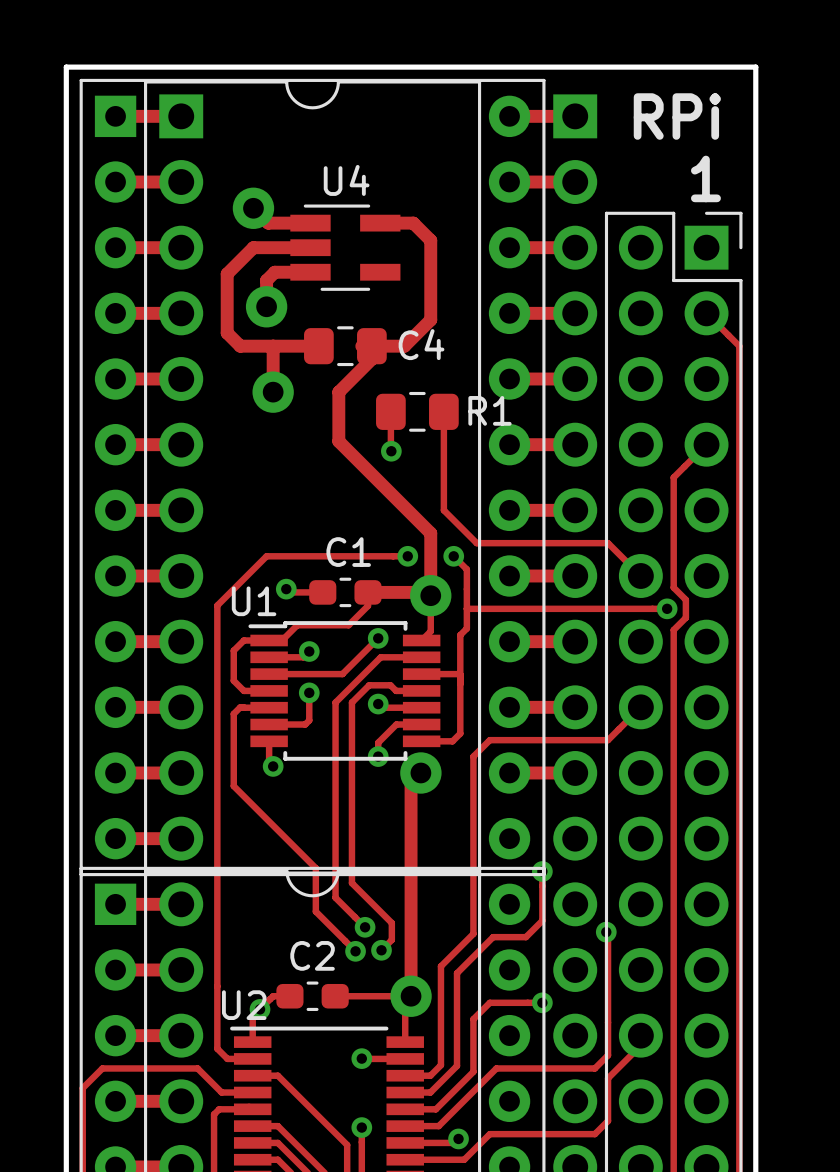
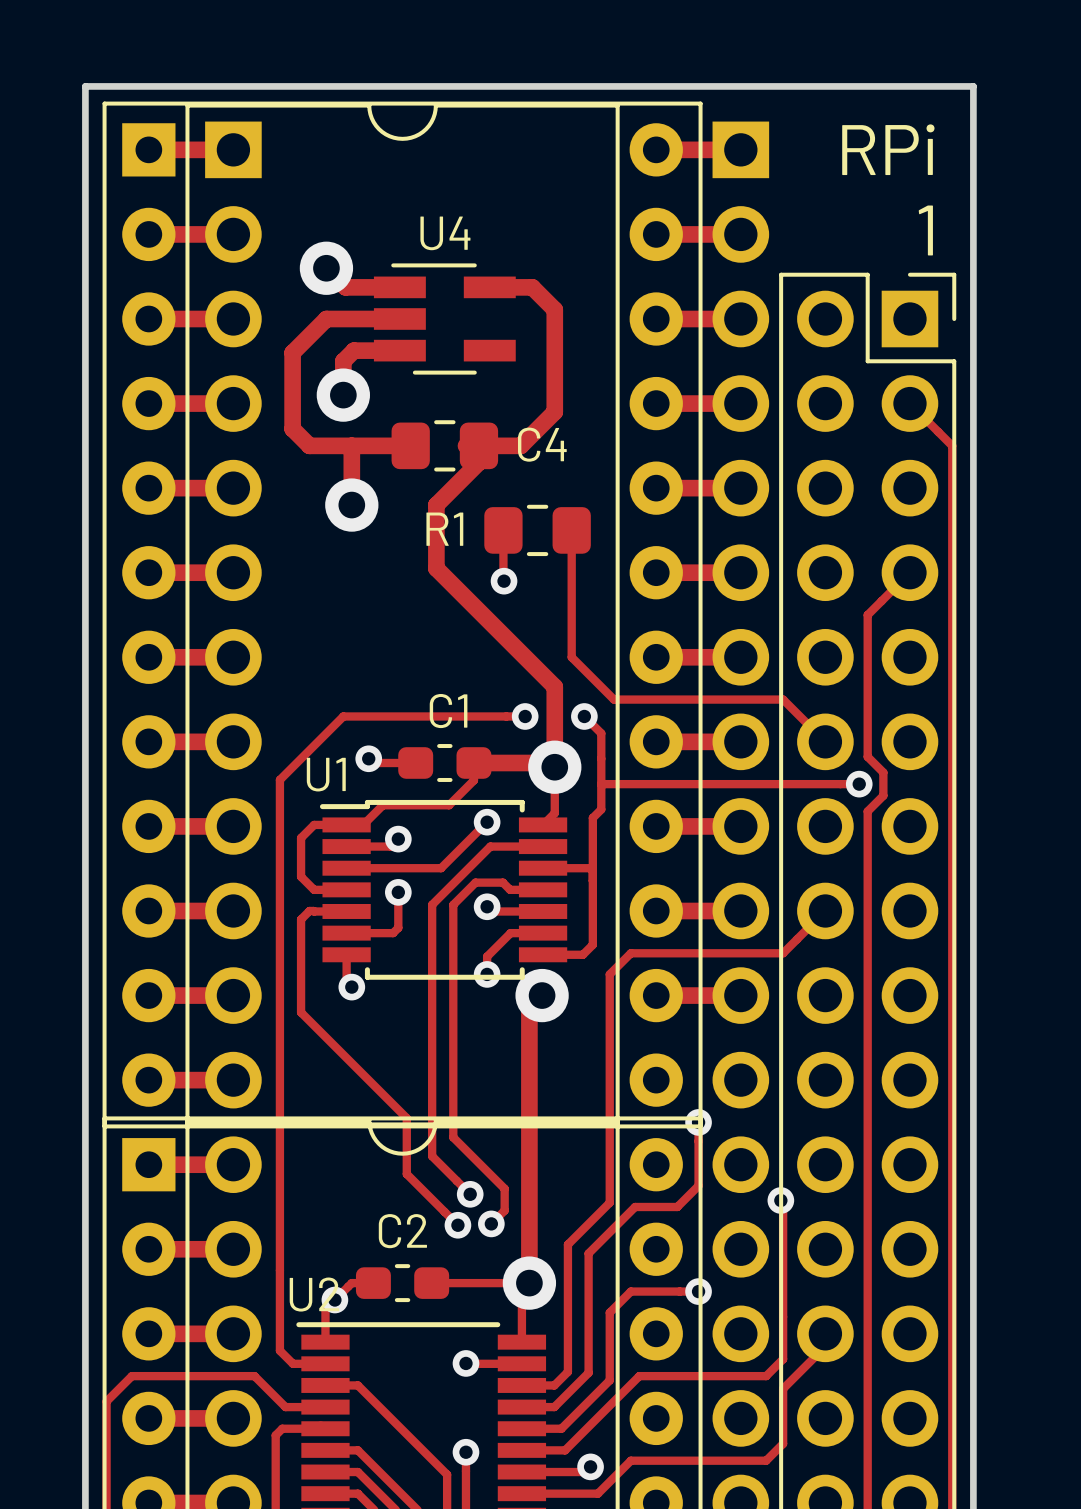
R1 name position: R1 (490, 410) -> R1 (444, 529)

